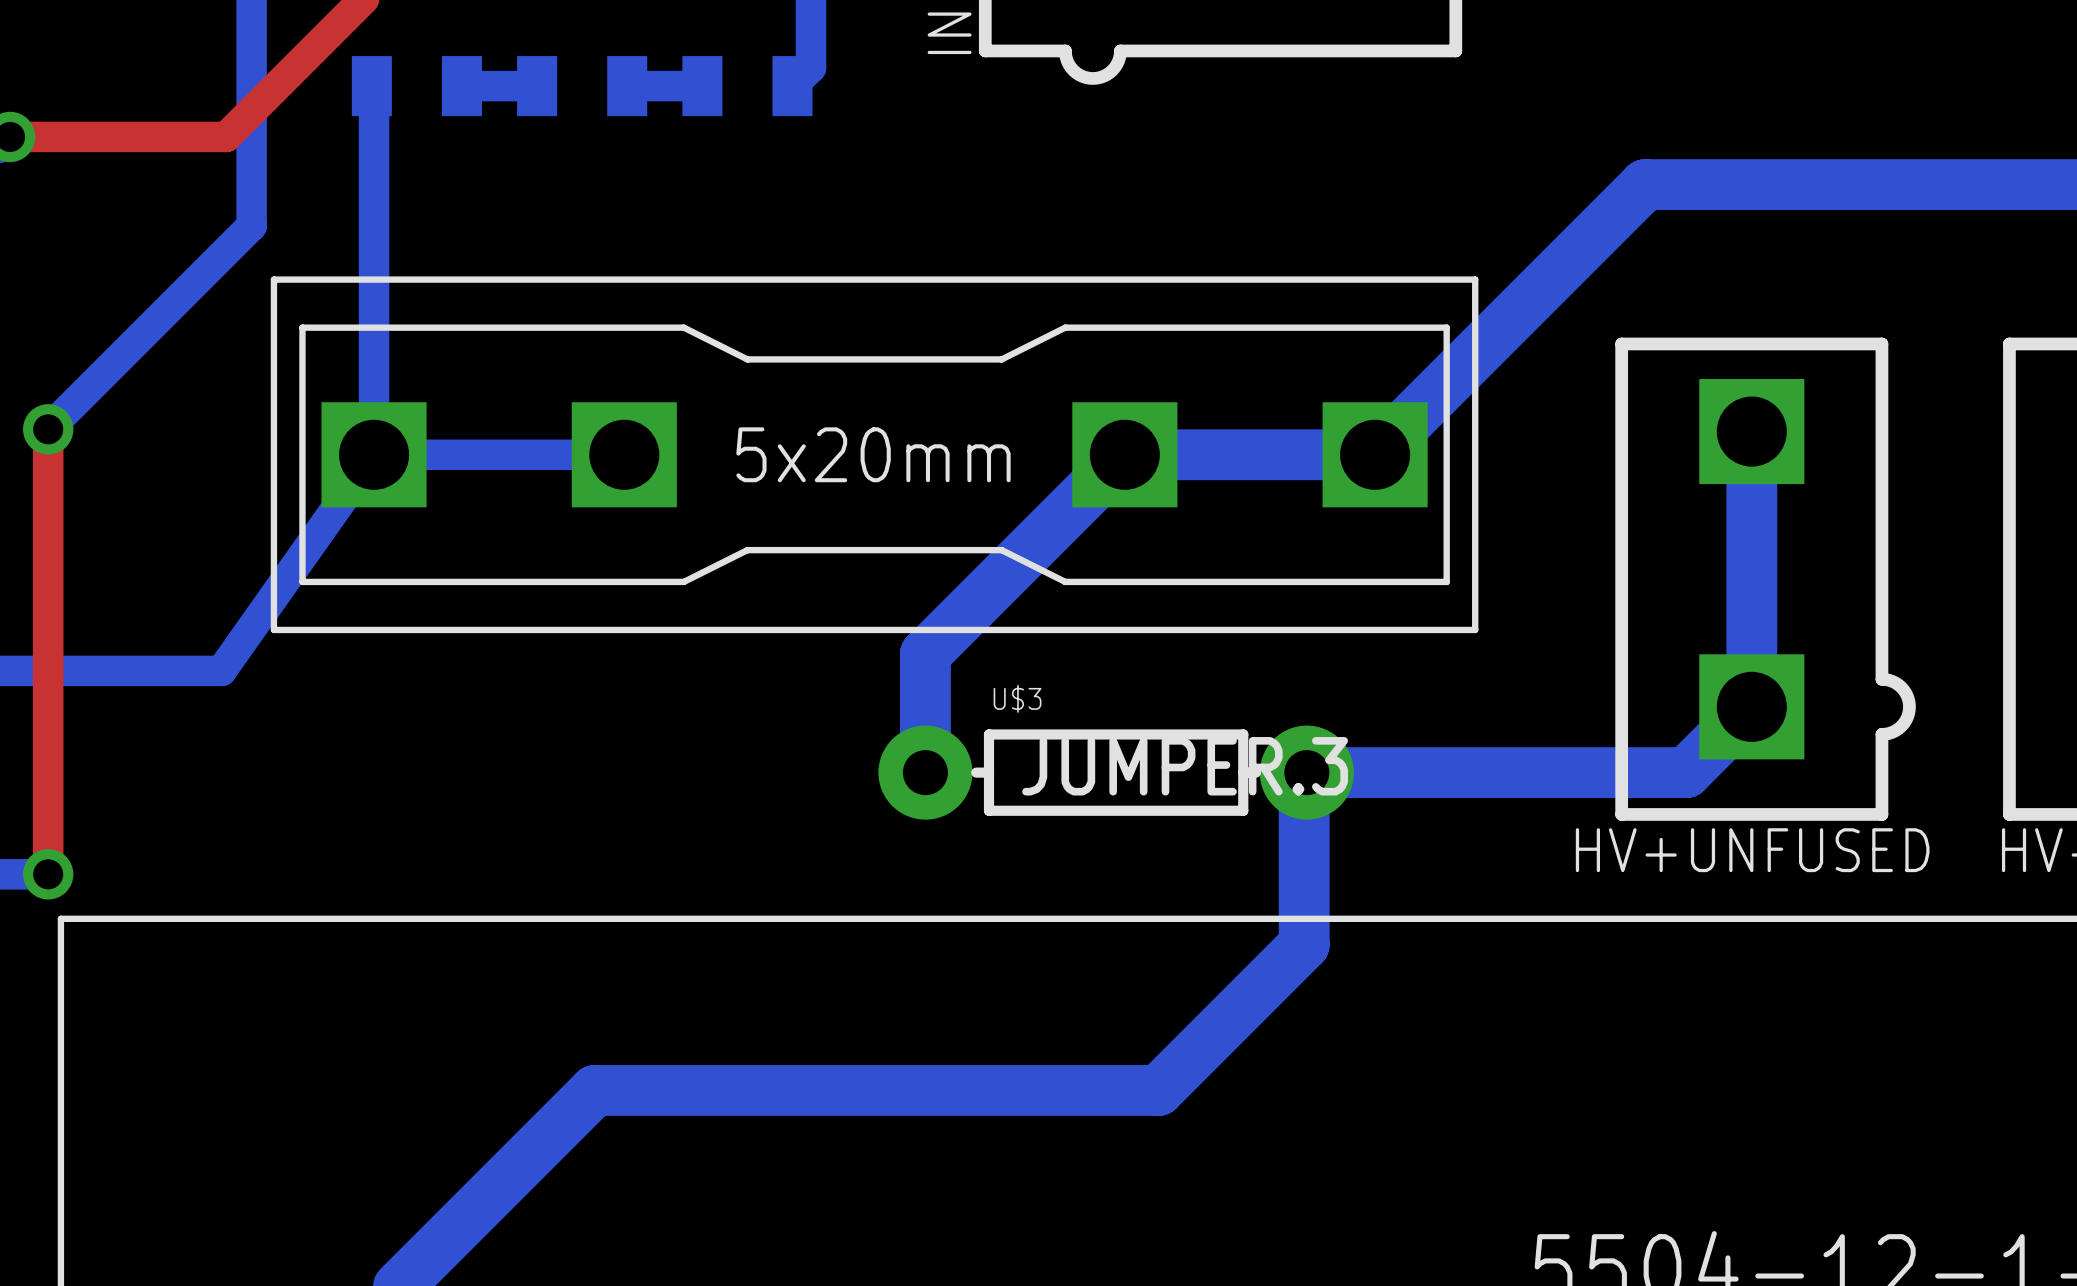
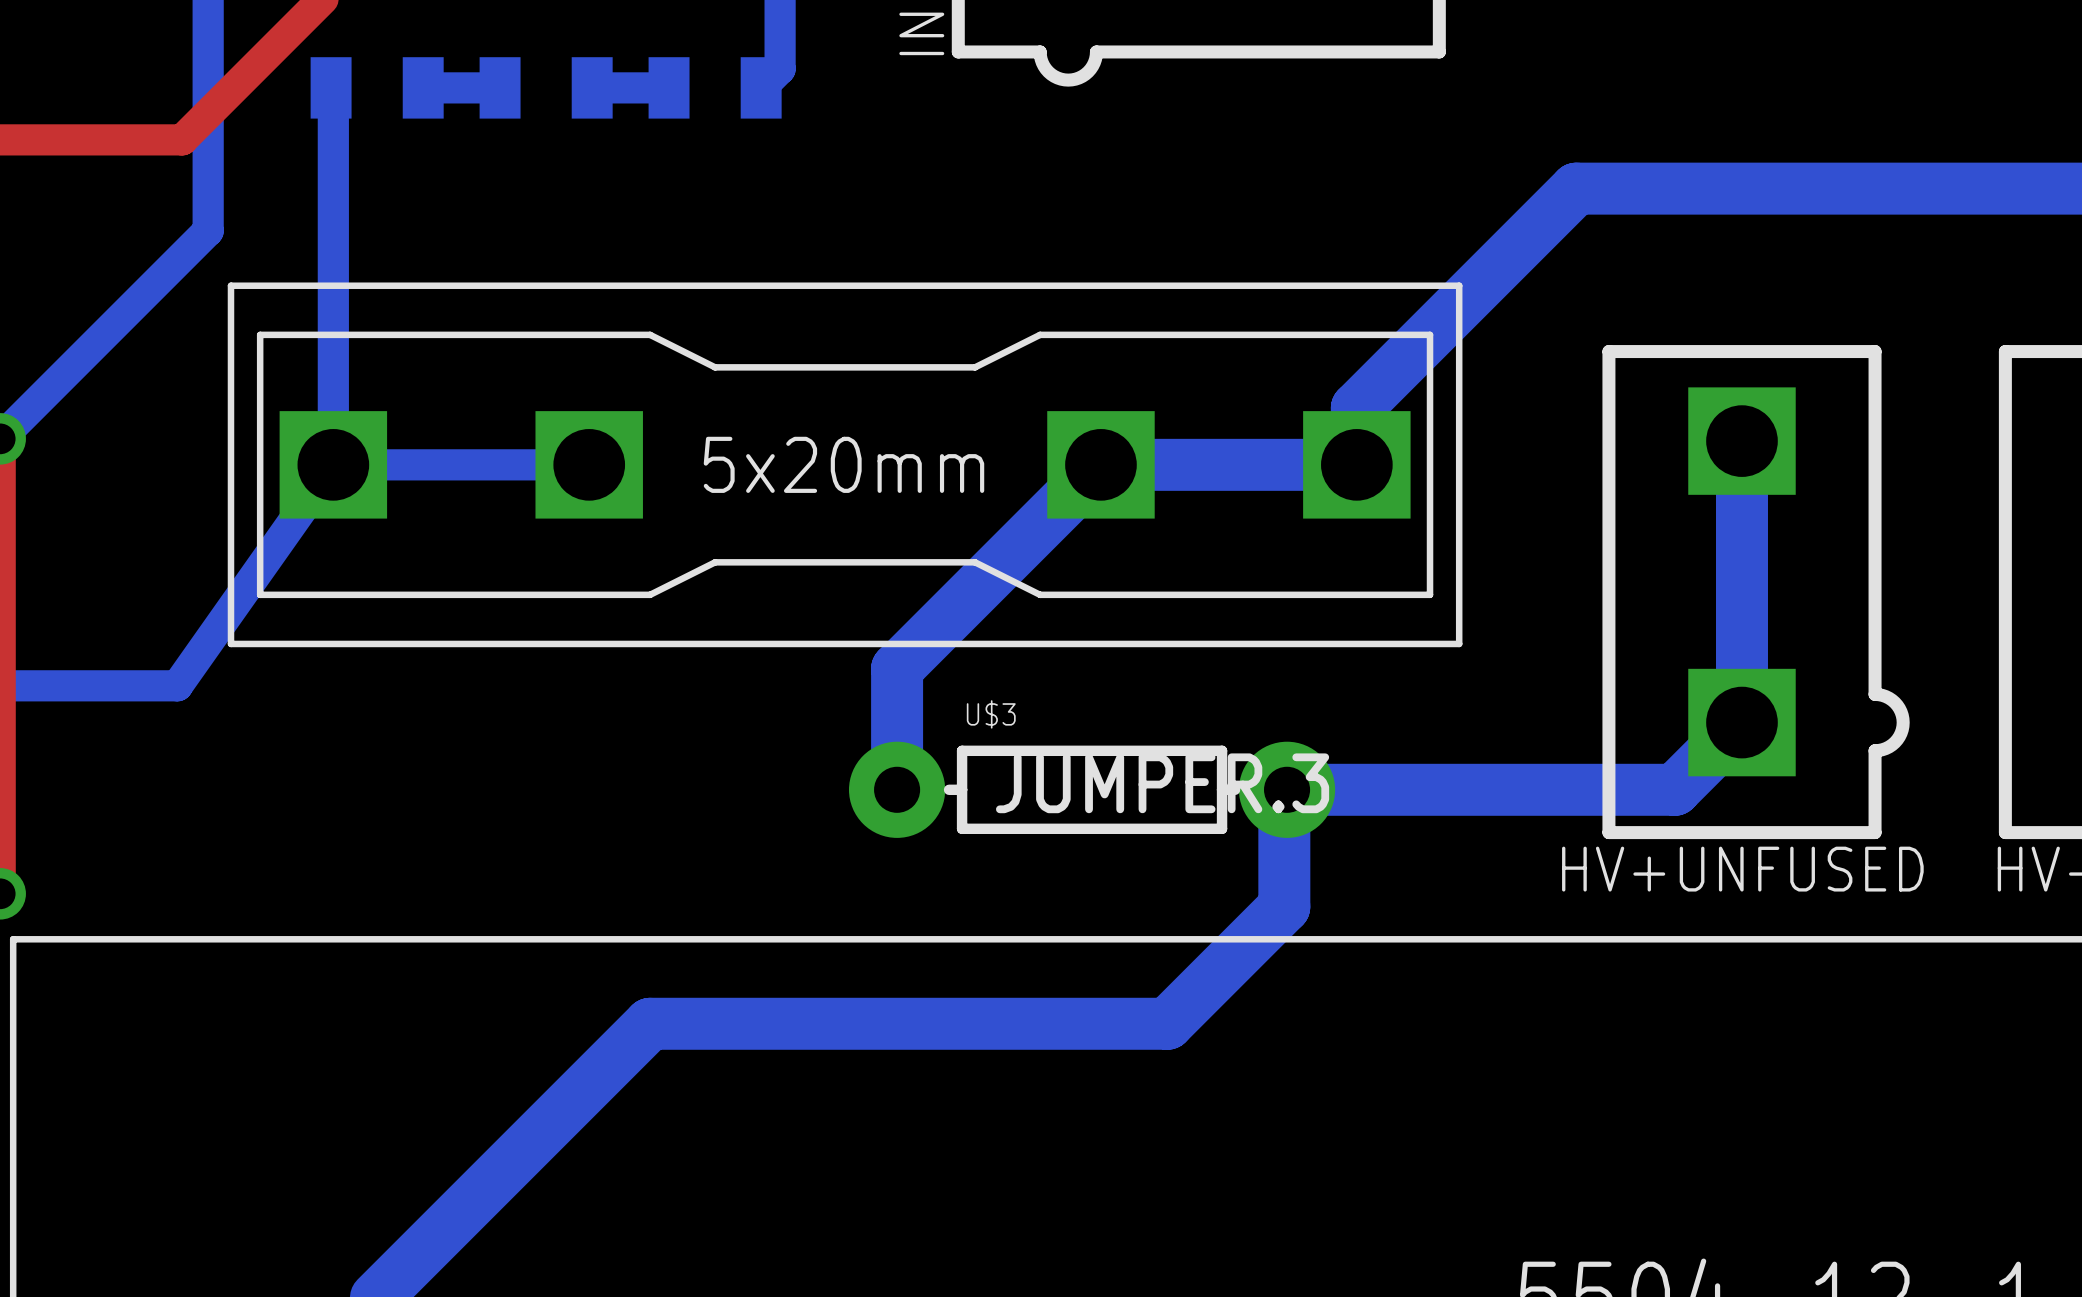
bottom track: (1645, 184) (1375, 454) -> (1633, 188) (1576, 188) (1356, 408) (1356, 464)
bottom track: (1304, 887) (1304, 944) (1158, 1090) (594, 1090) -> (1284, 906) (1167, 1023) (650, 1023) (559, 1114)

